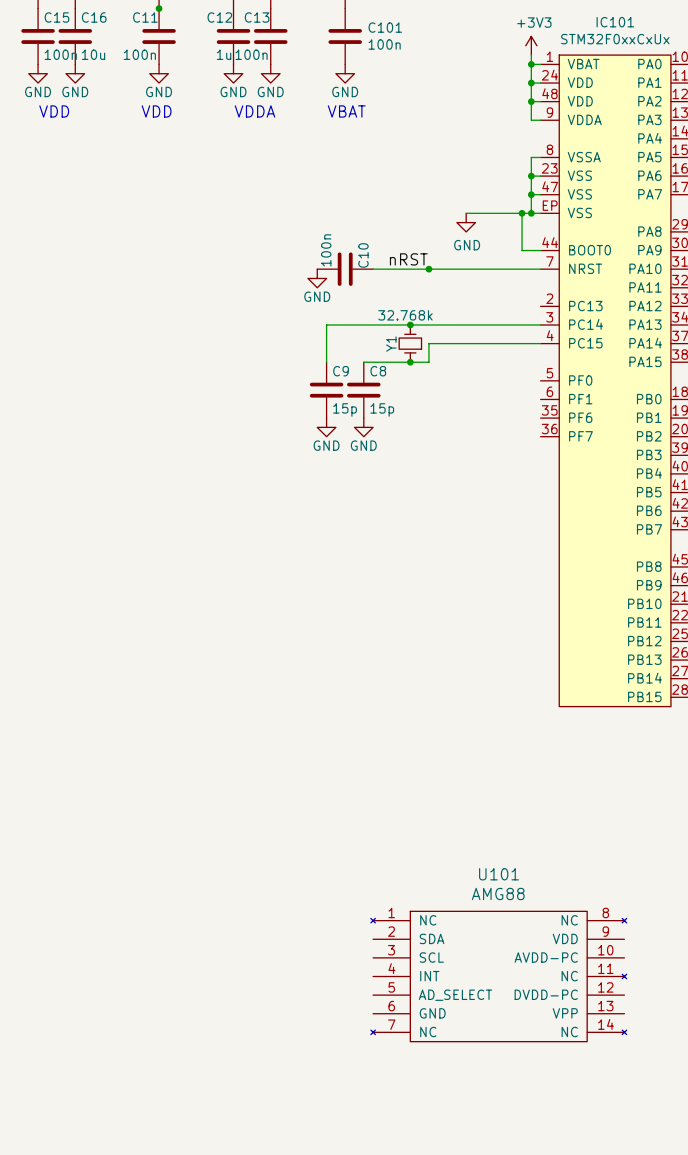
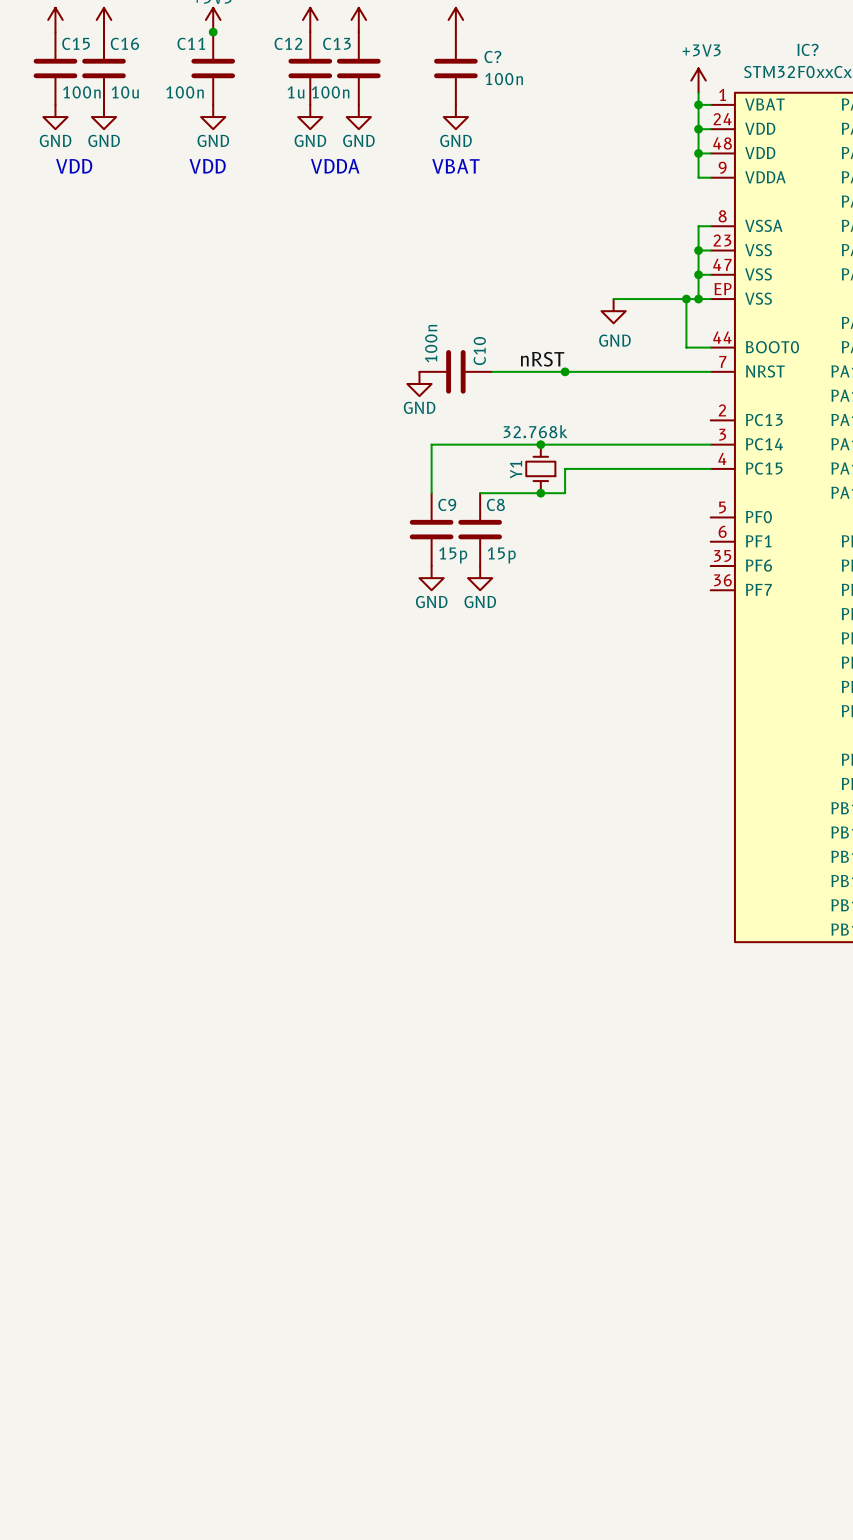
IC101 name: IC101 (615, 22) -> IC? (808, 49)
C101 name: C101 (385, 27) -> C? (492, 56)
U101: AMG88 (498, 976) -> none

